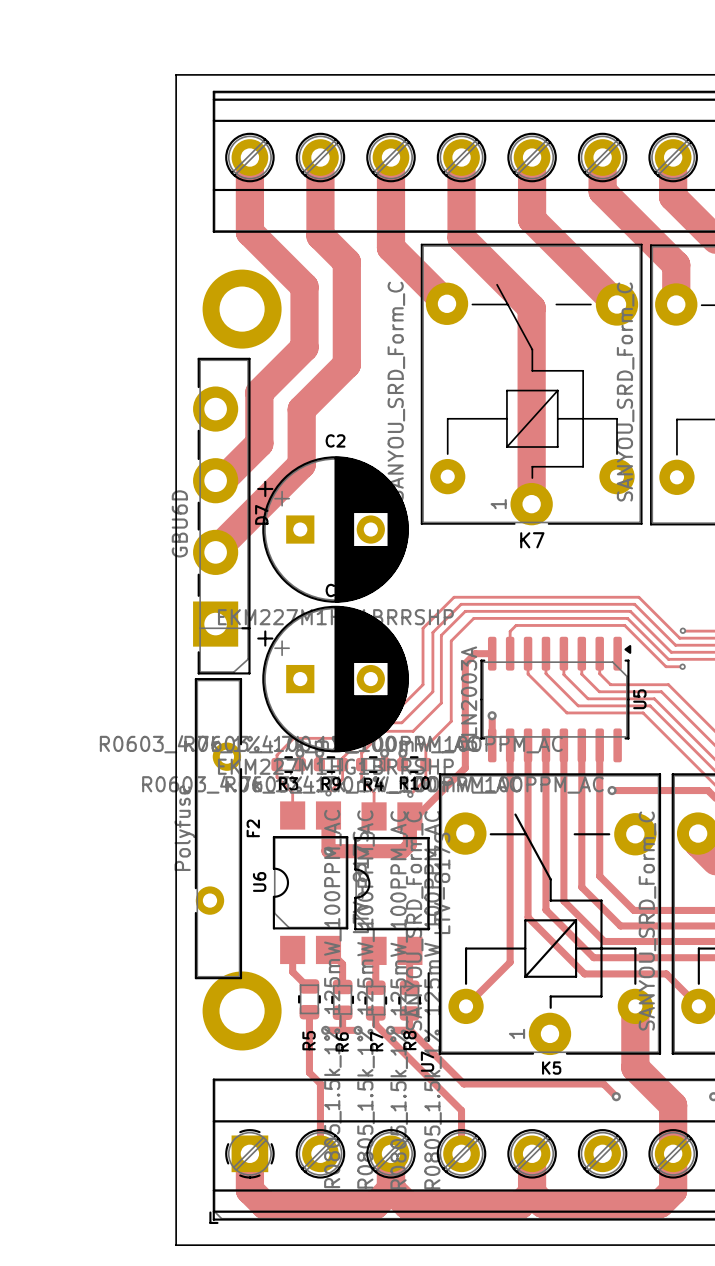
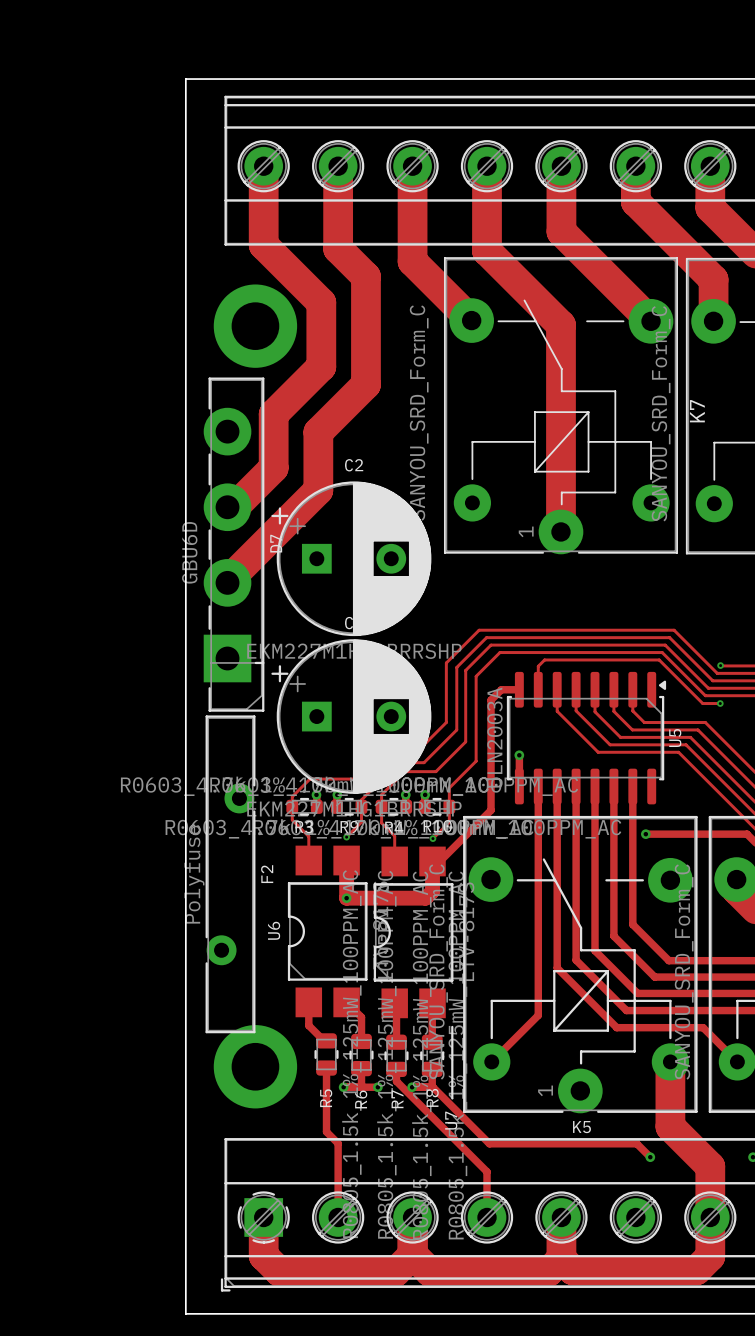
K7 name rotation: 0° (532, 540) -> 90° counterclockwise (697, 411)
K7 name position: K7 (532, 540) -> K7 (697, 411)

